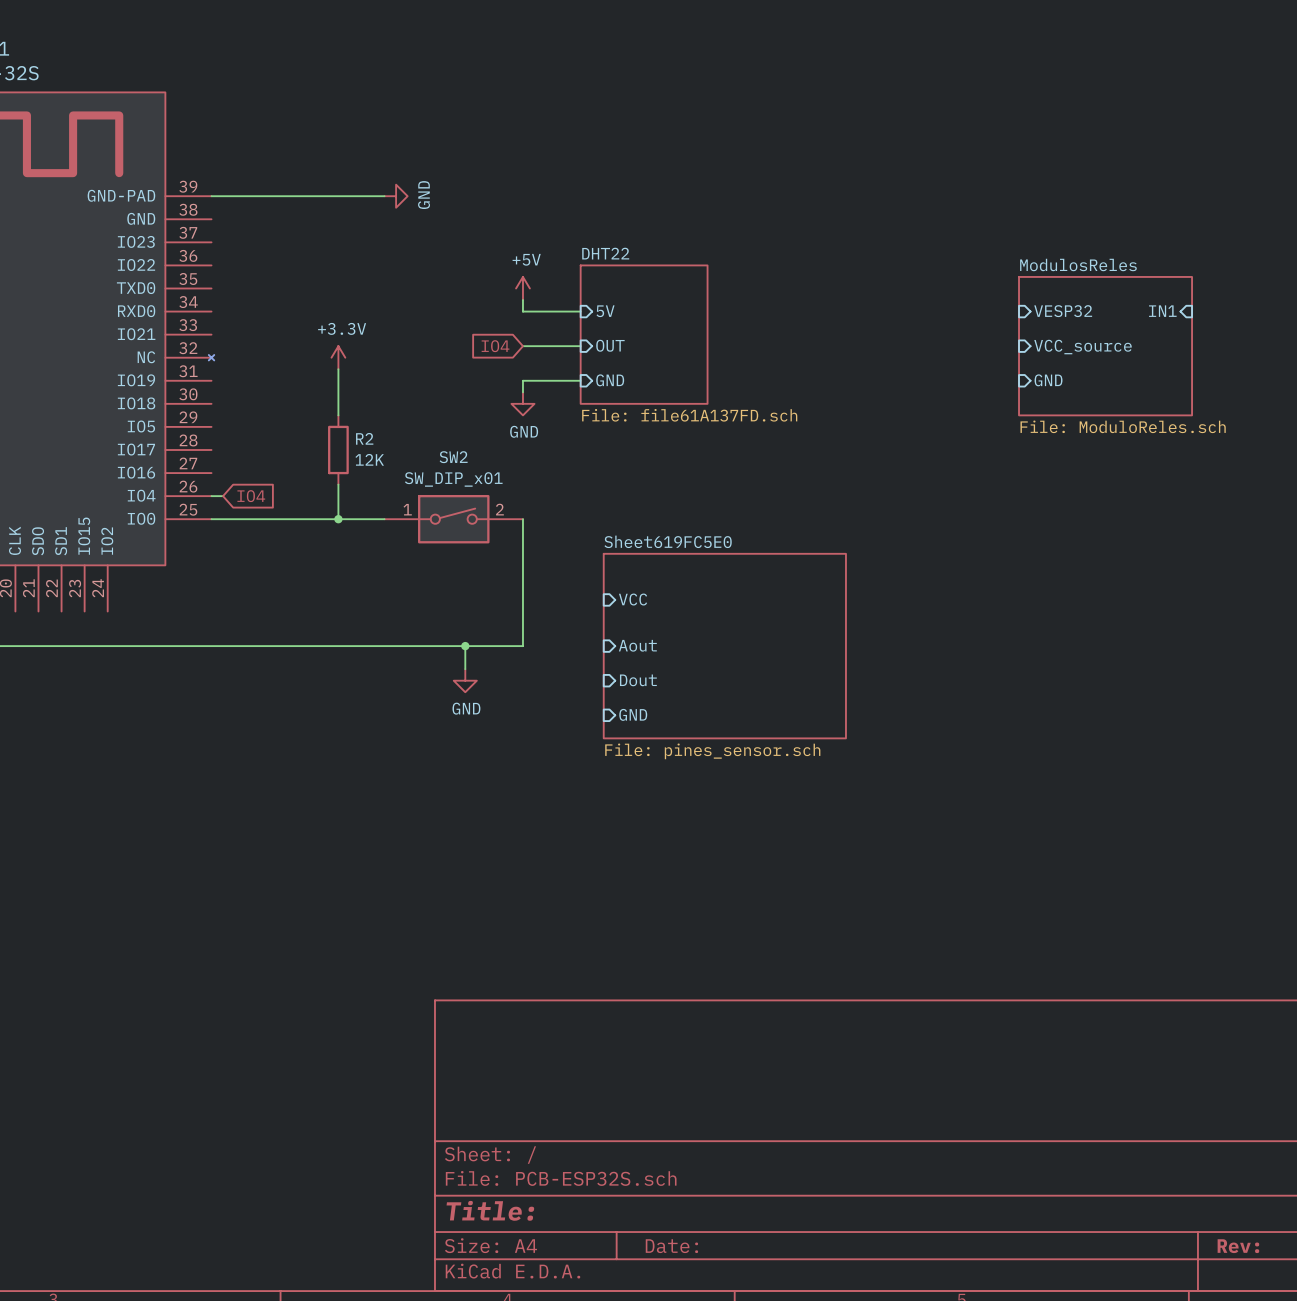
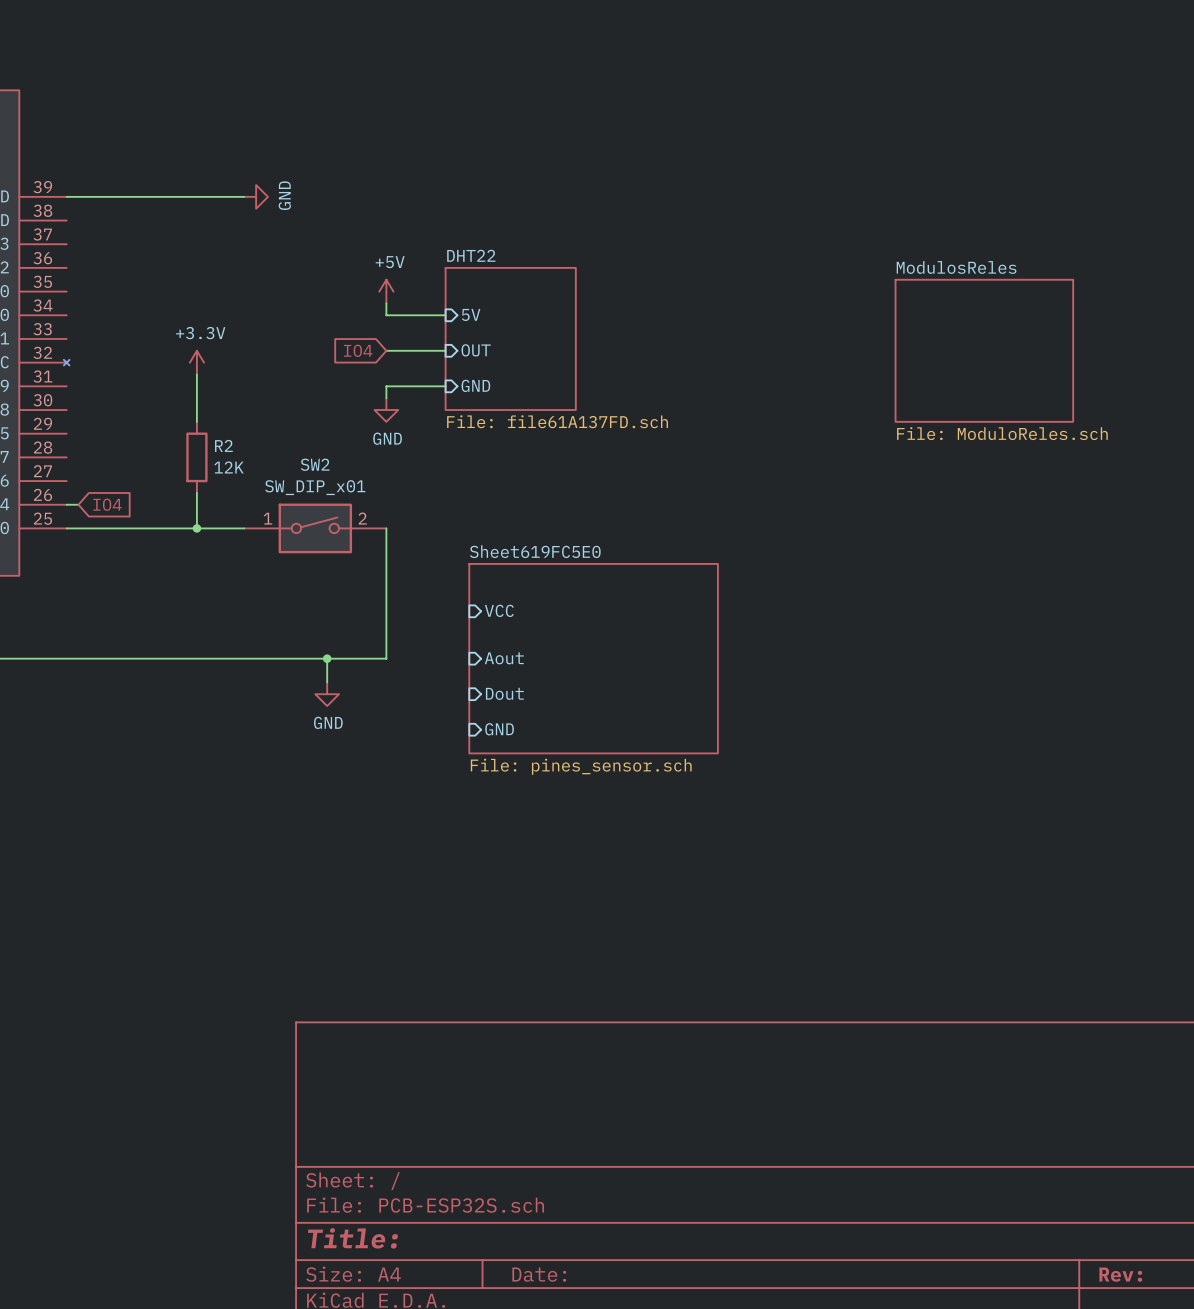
sheet pin: VESP32 (1063, 311) -> none
sheet pin: IN1 (1162, 311) -> none
sheet pin: VCC_source (1082, 347) -> none
sheet pin: GND (1048, 380) -> none

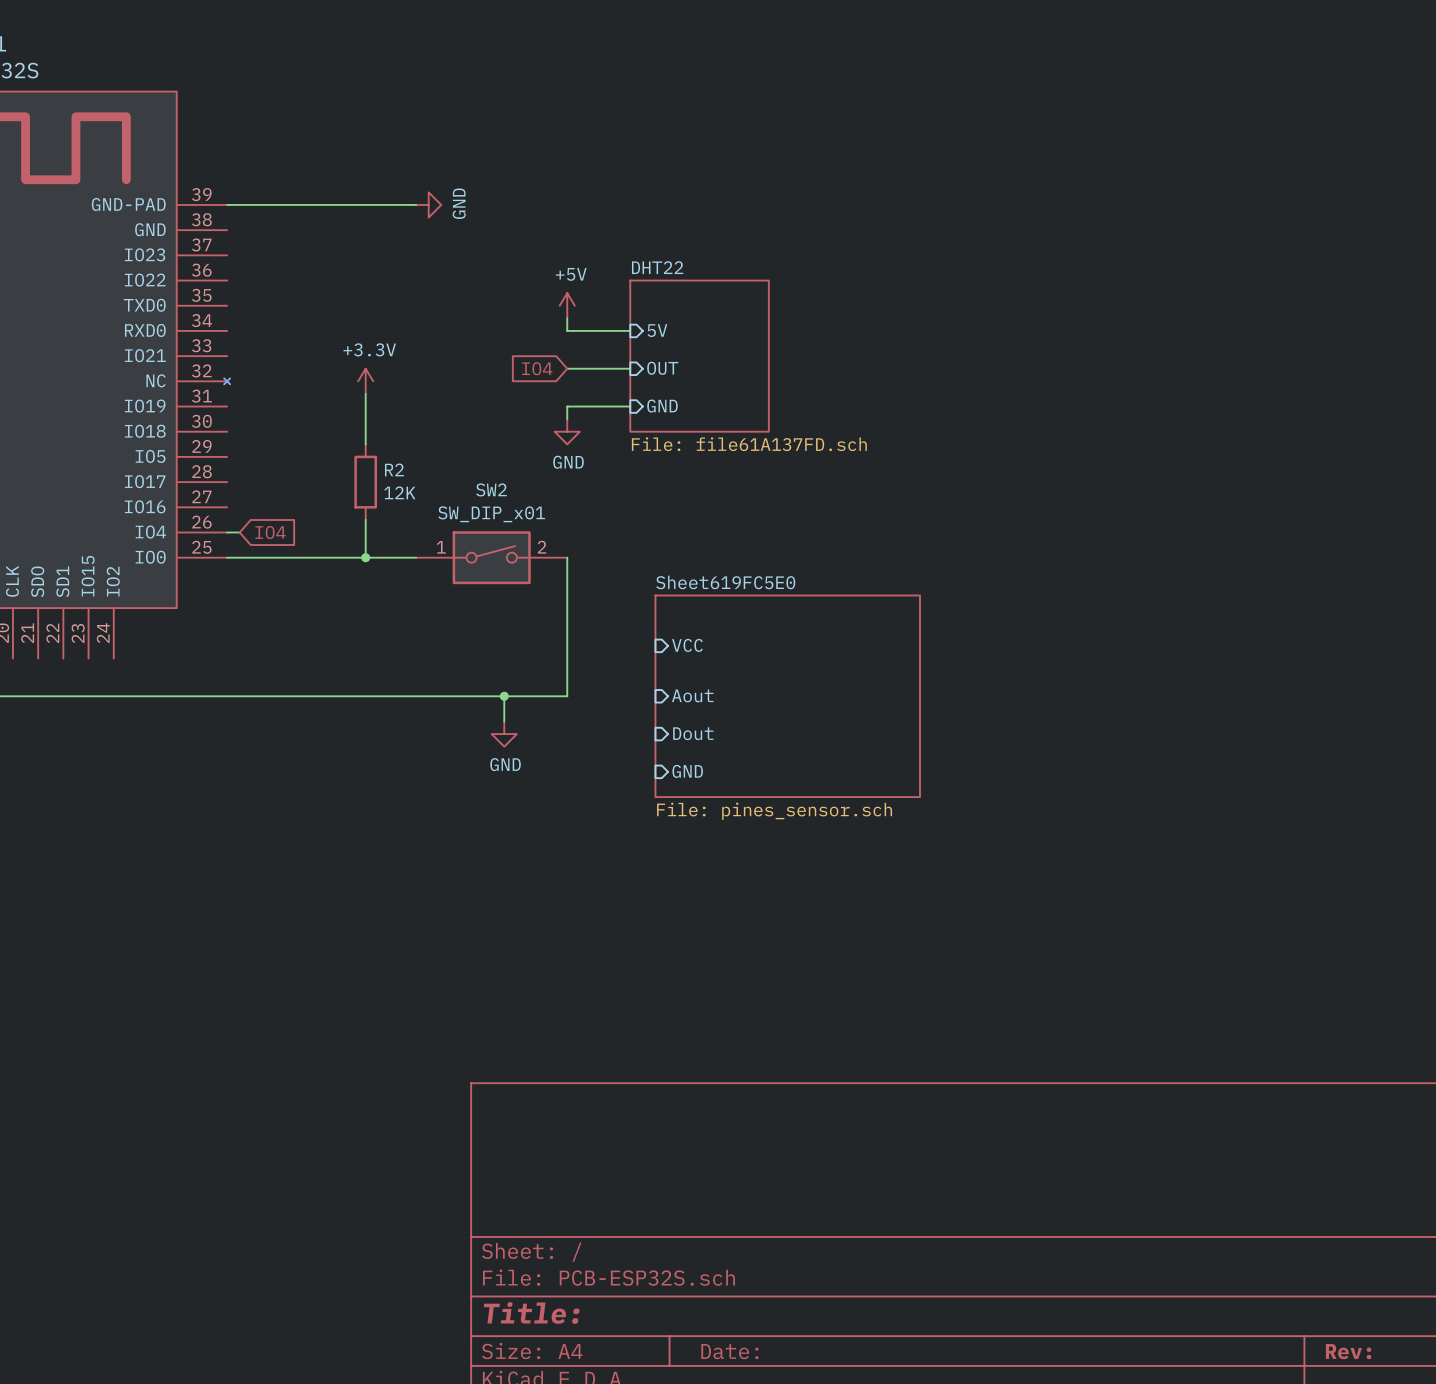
sheet ModulosReles: File: ModuloReles.sch (984, 350) -> none

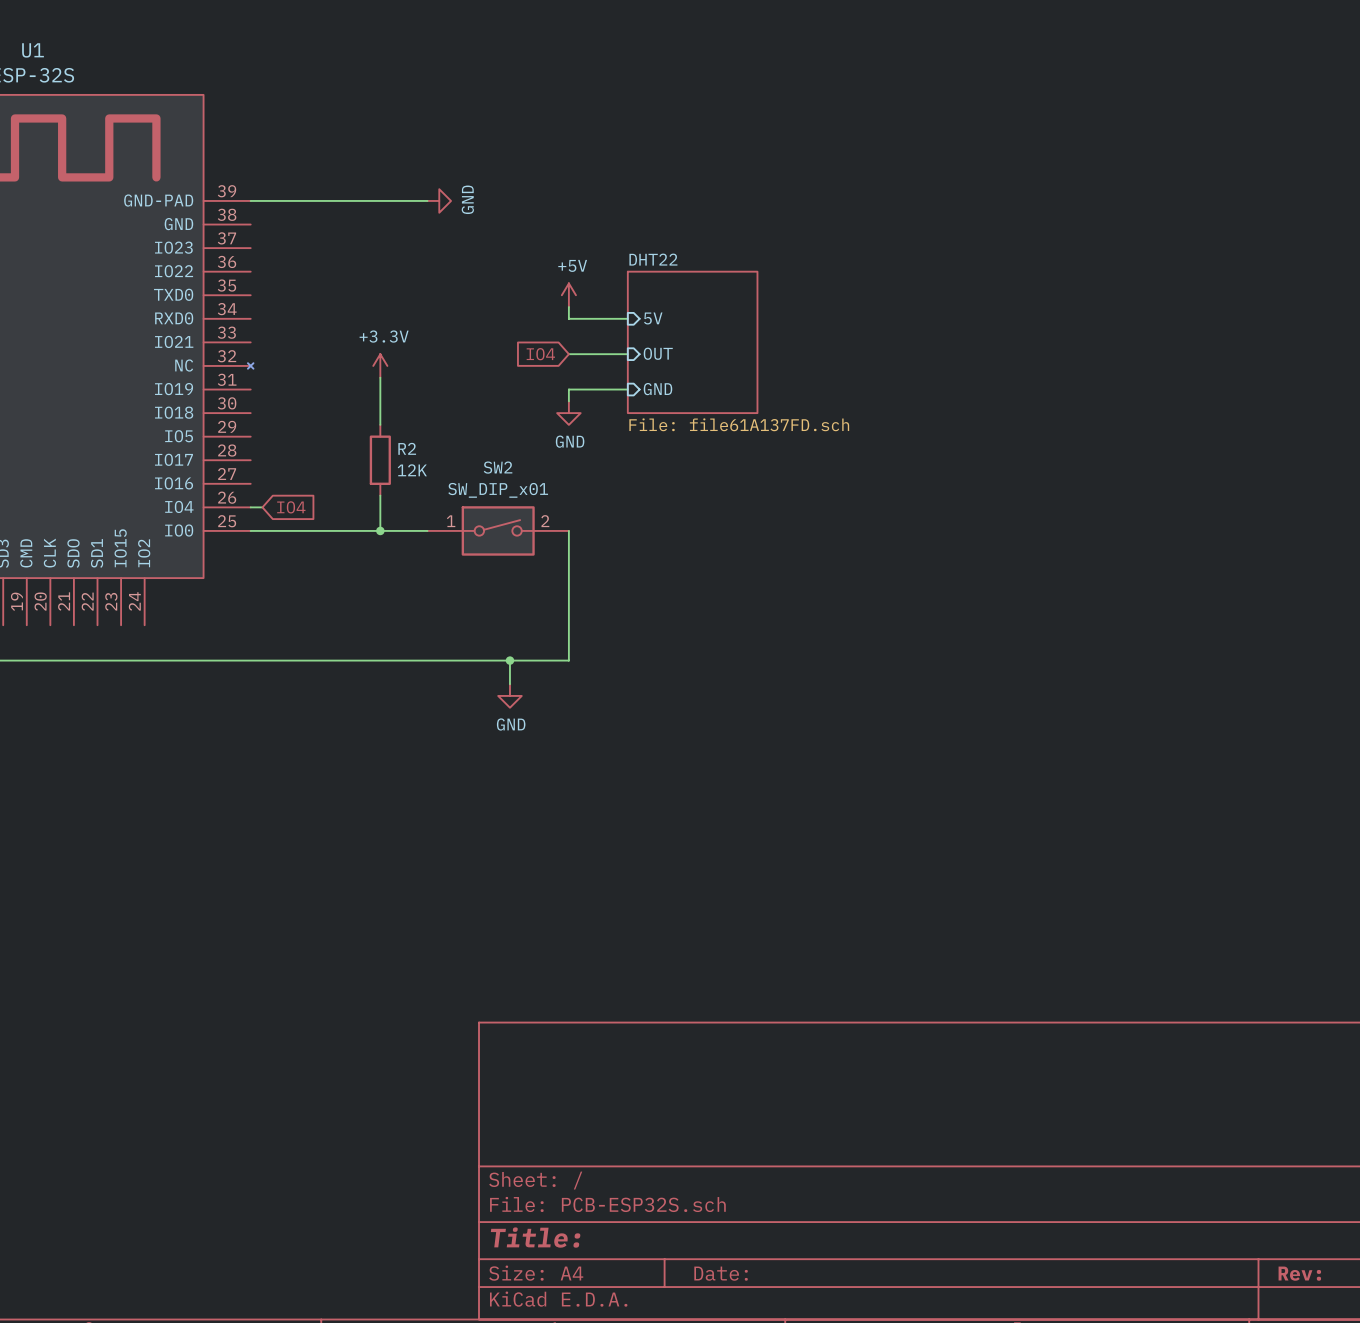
sheet pin: VCC (687, 645) -> none
sheet pin: Aout (692, 695) -> none
sheet Sheet619FC5E0: File: pines_sensor.sch (787, 696) -> none
sheet pin: Dout (693, 733) -> none
sheet pin: GND (687, 771) -> none

